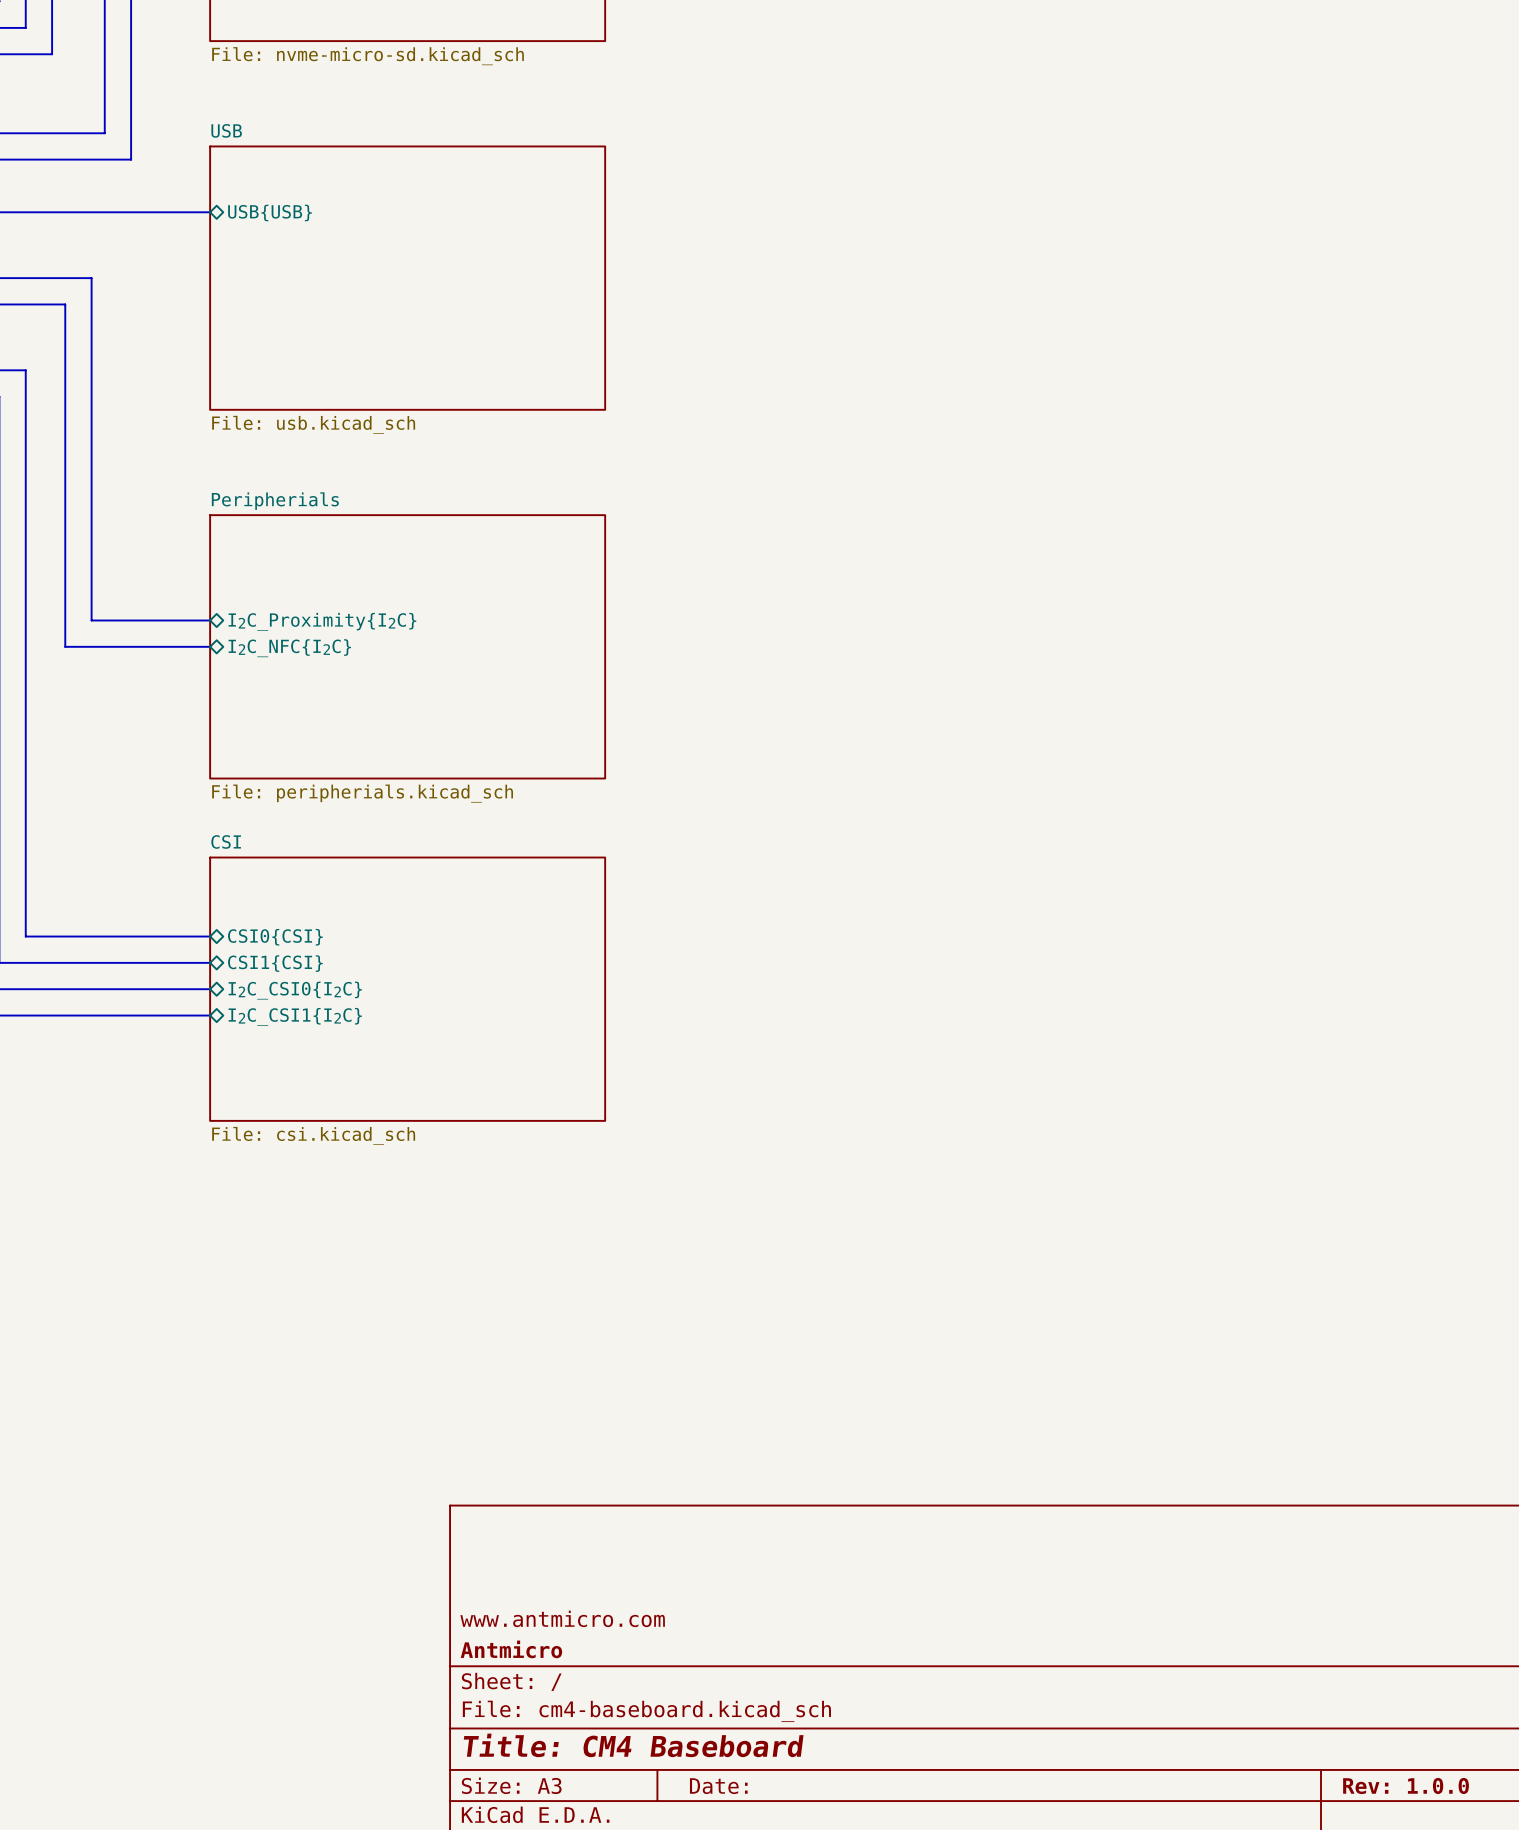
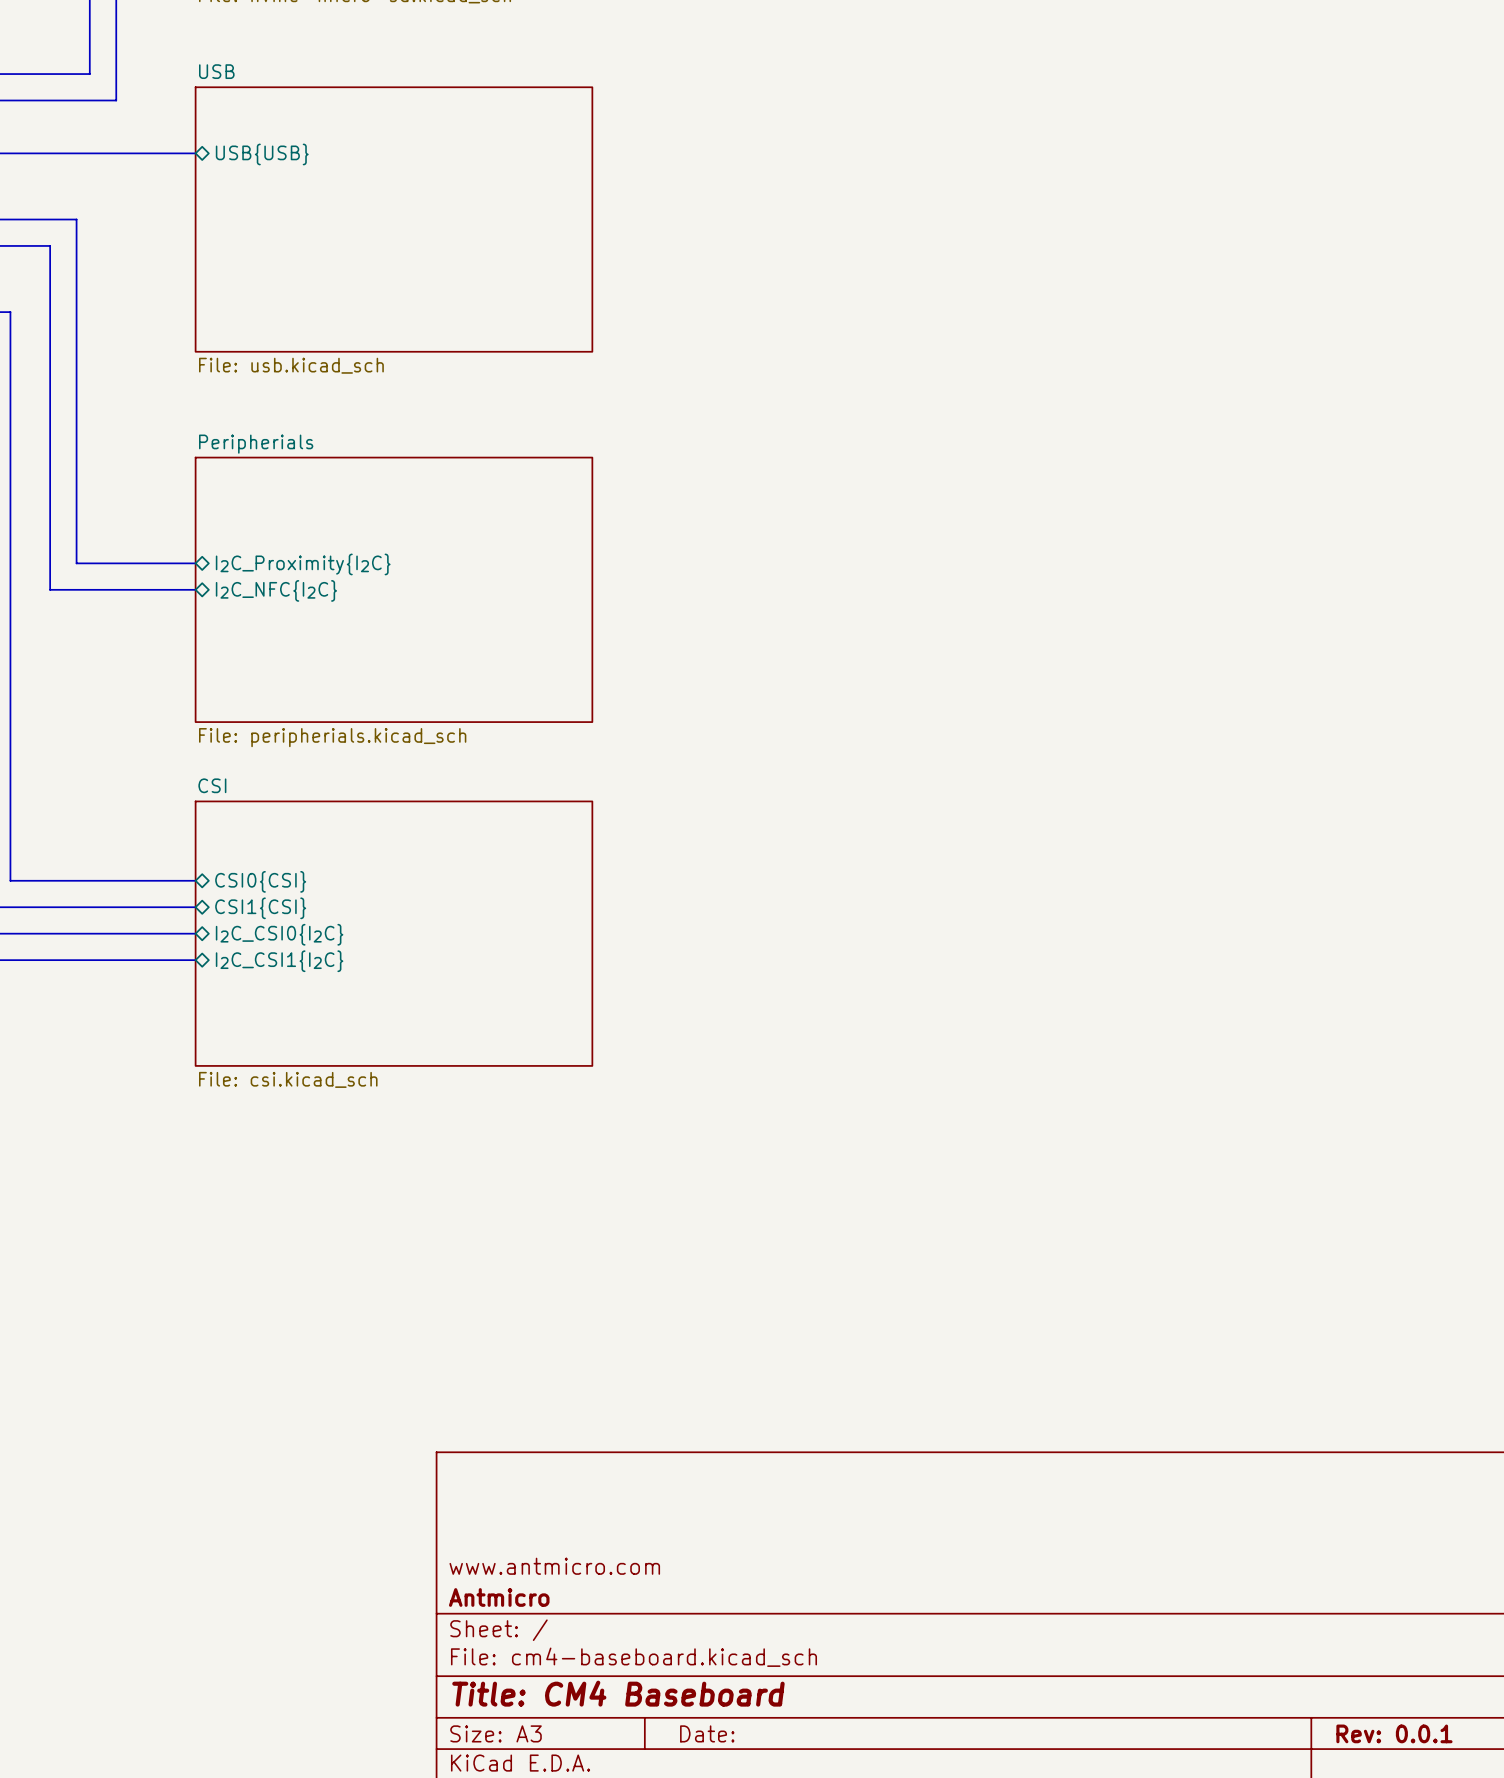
title block: Rev: 1.0.0 (1406, 1785) -> Rev: 0.0.1 (1394, 1733)

